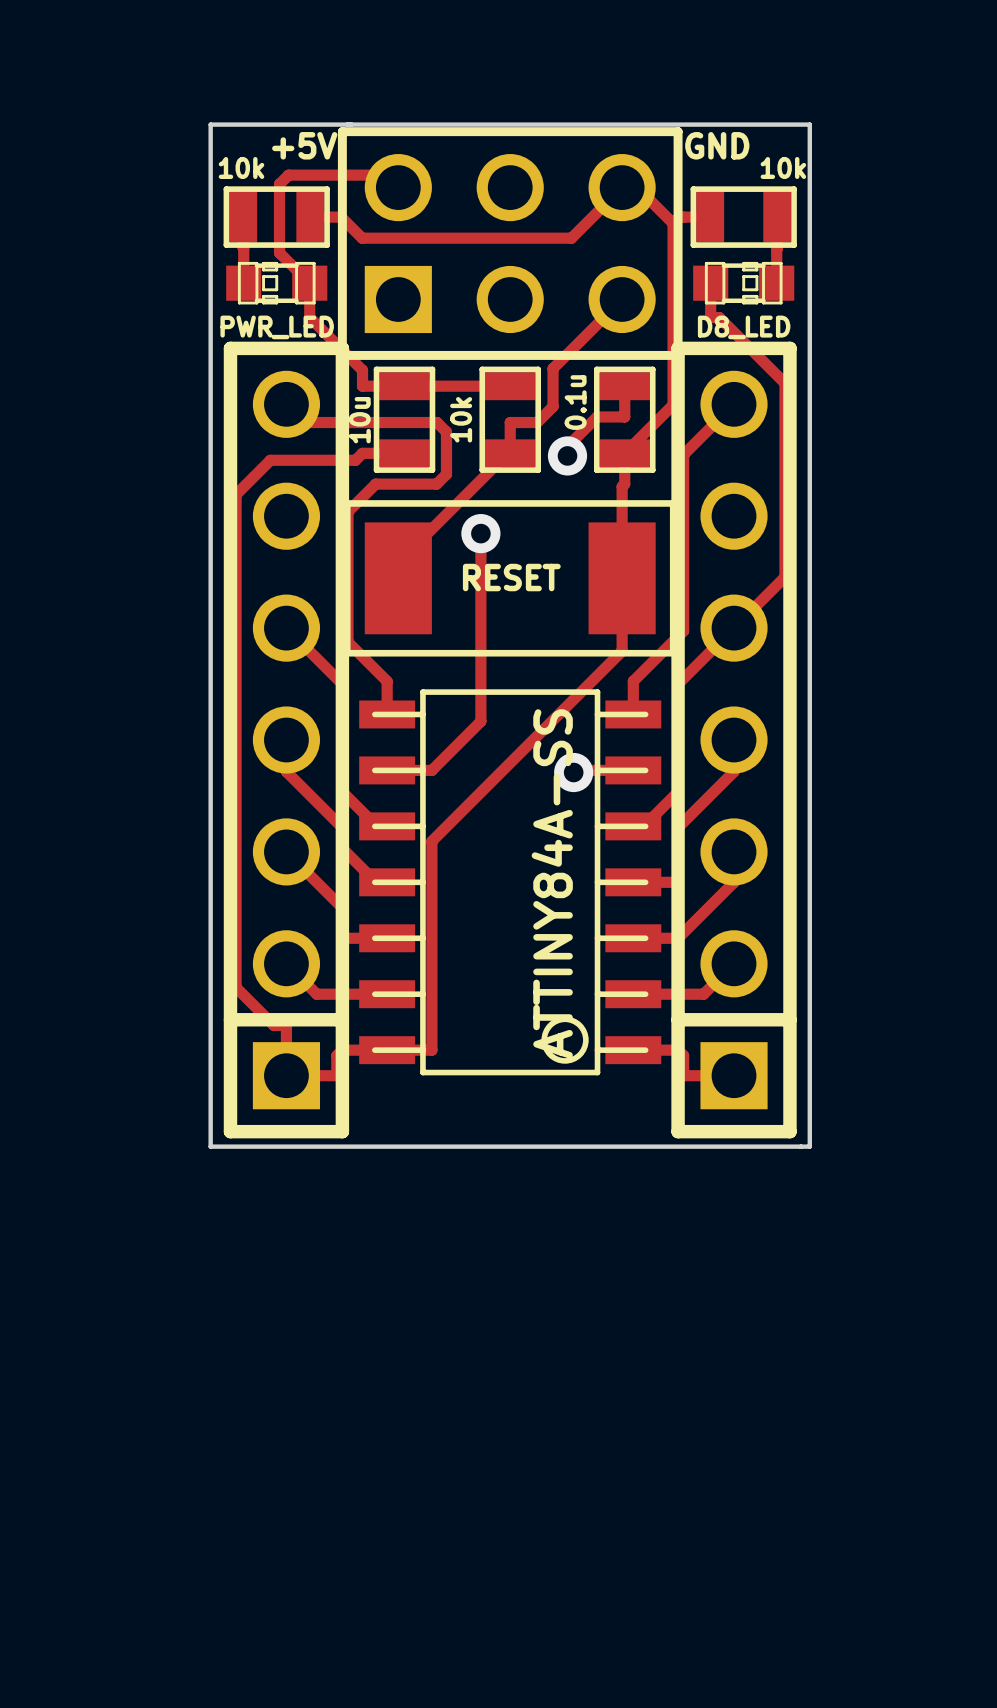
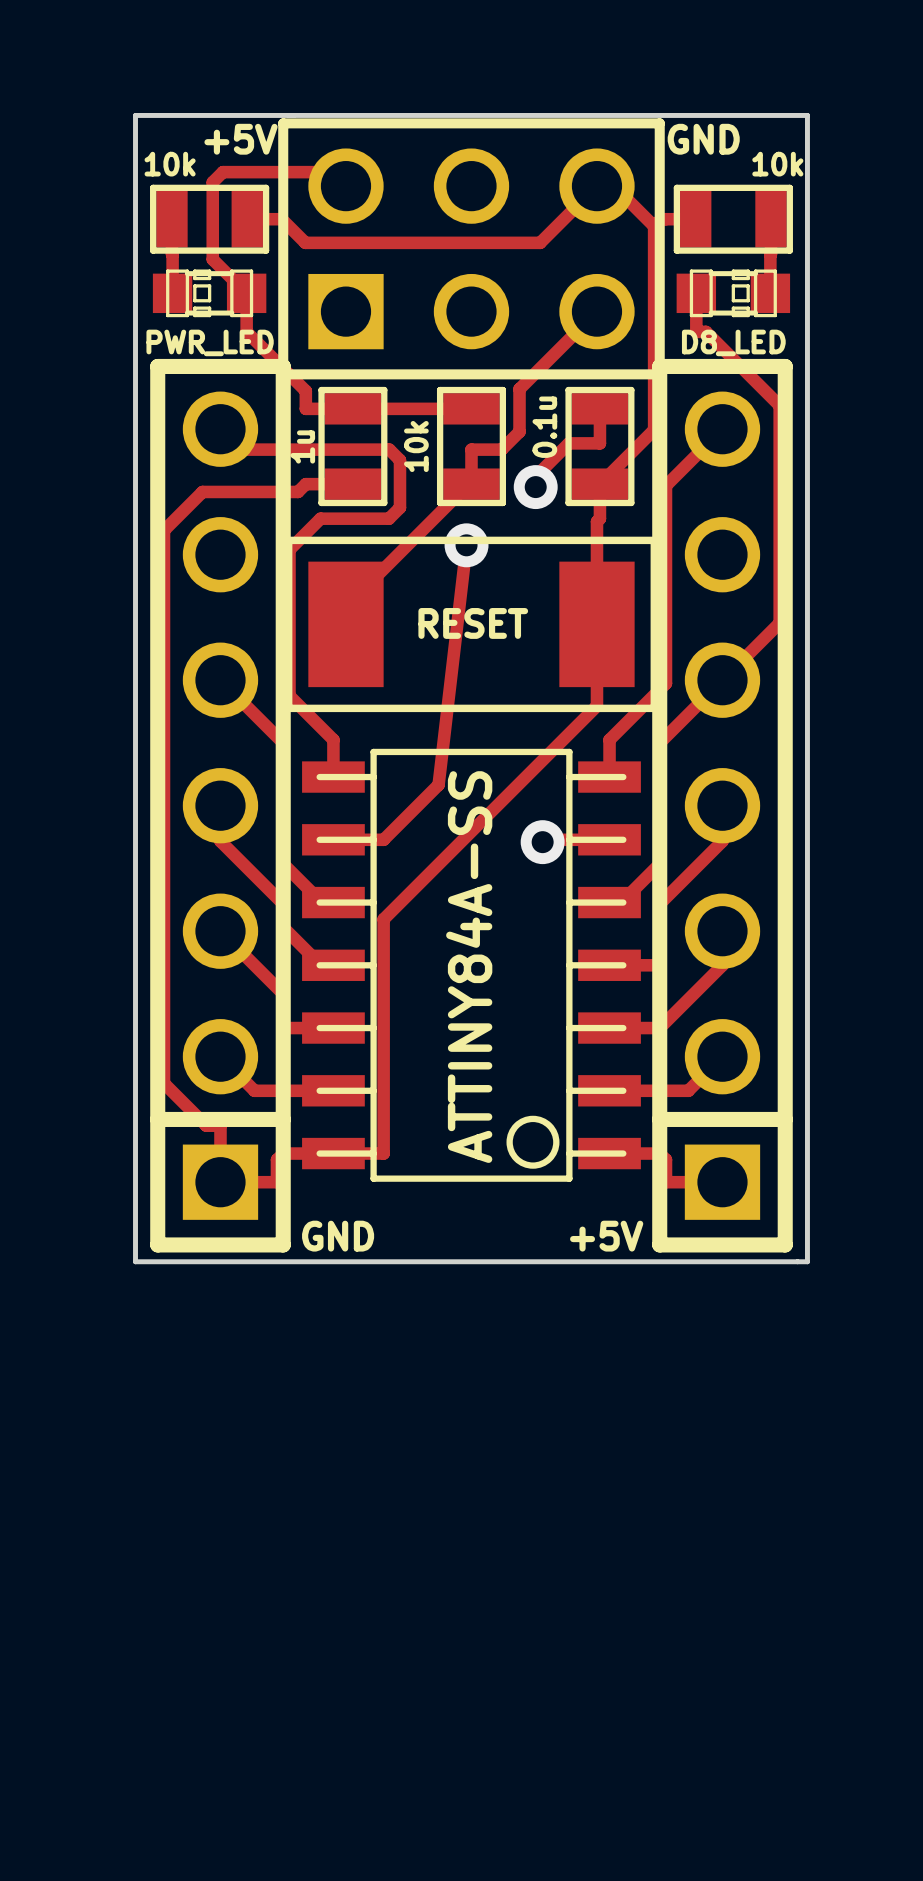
part value: 10u (359, 420) -> 1u (302, 446)
track: (480, 533) (480, 721) -> (466, 545) (438, 784)
via position: (480, 533) -> (466, 545)
part value position: ATTINY84A-SS (552, 883) -> ATTINY84A-SS (469, 967)
text: none -> GND (338, 1236)
text: none -> +5V (606, 1236)

